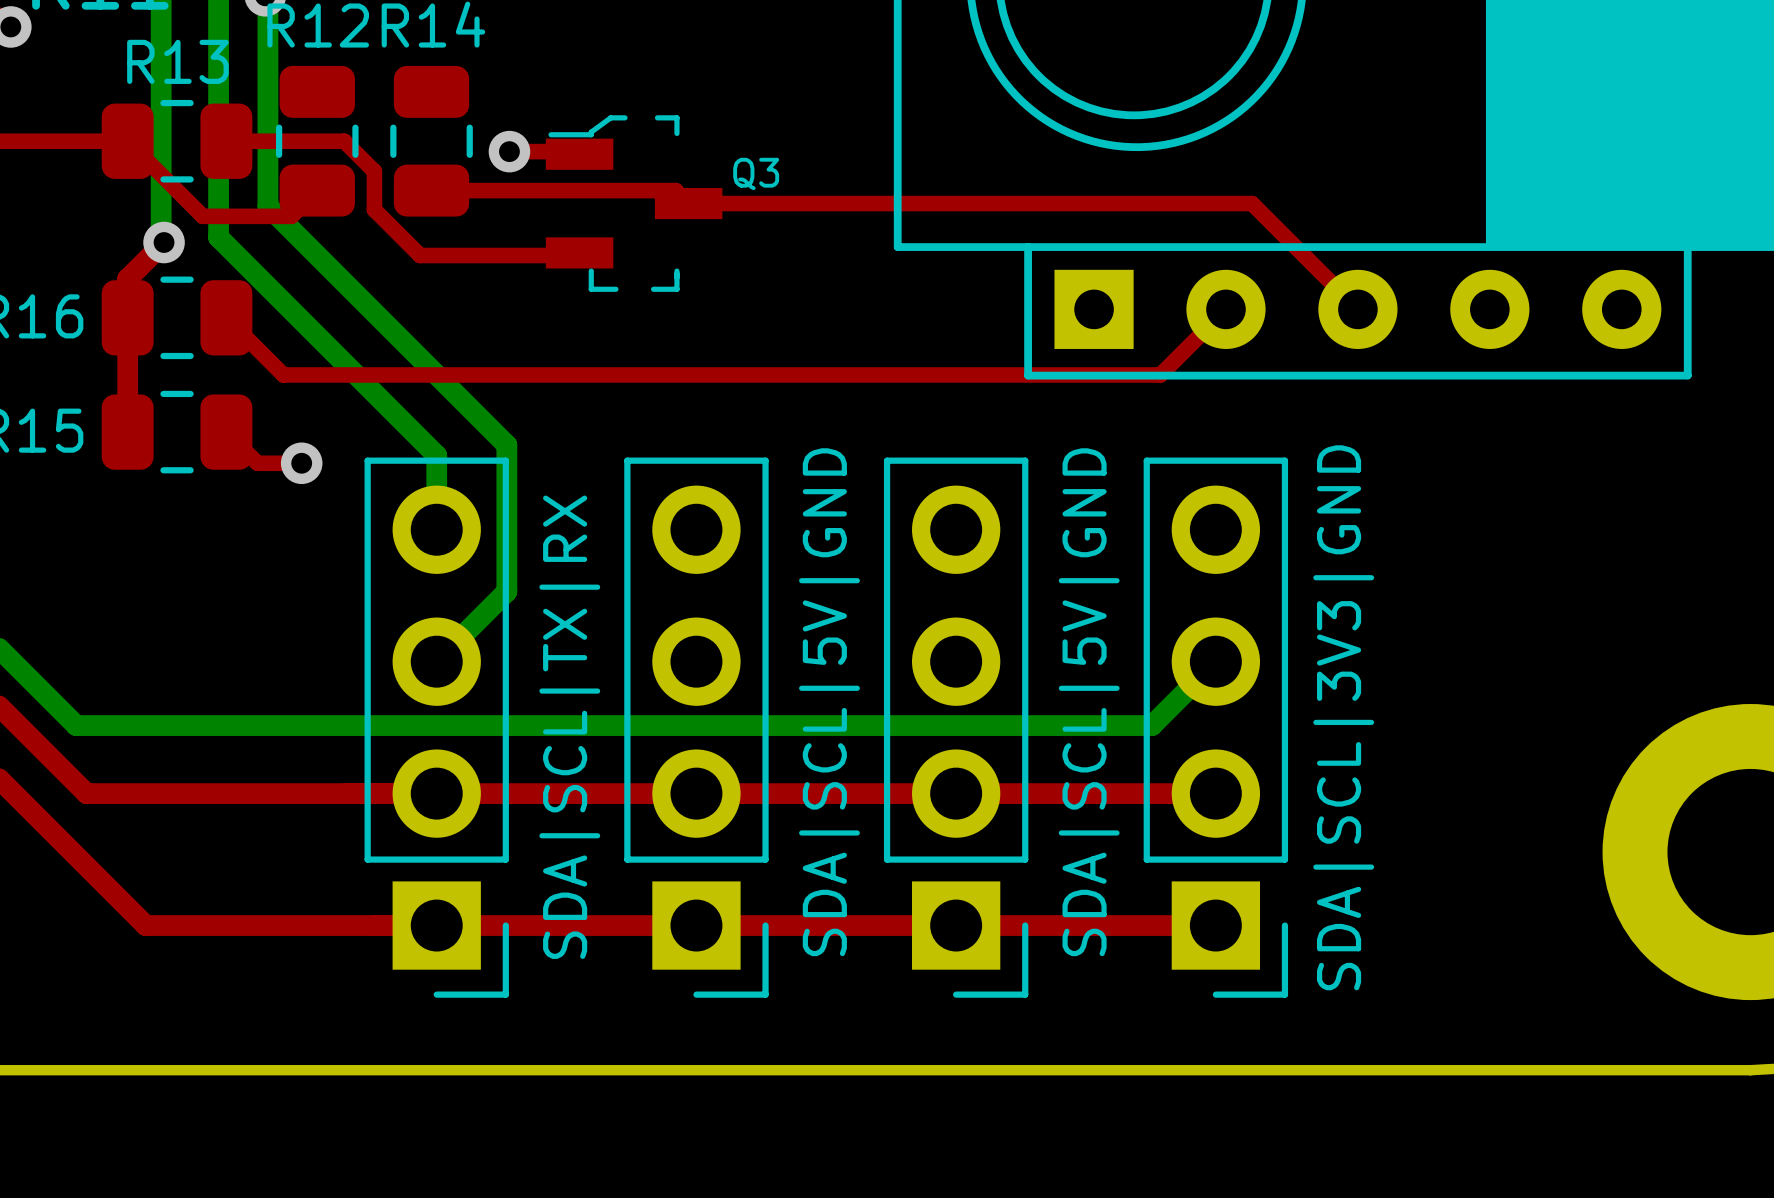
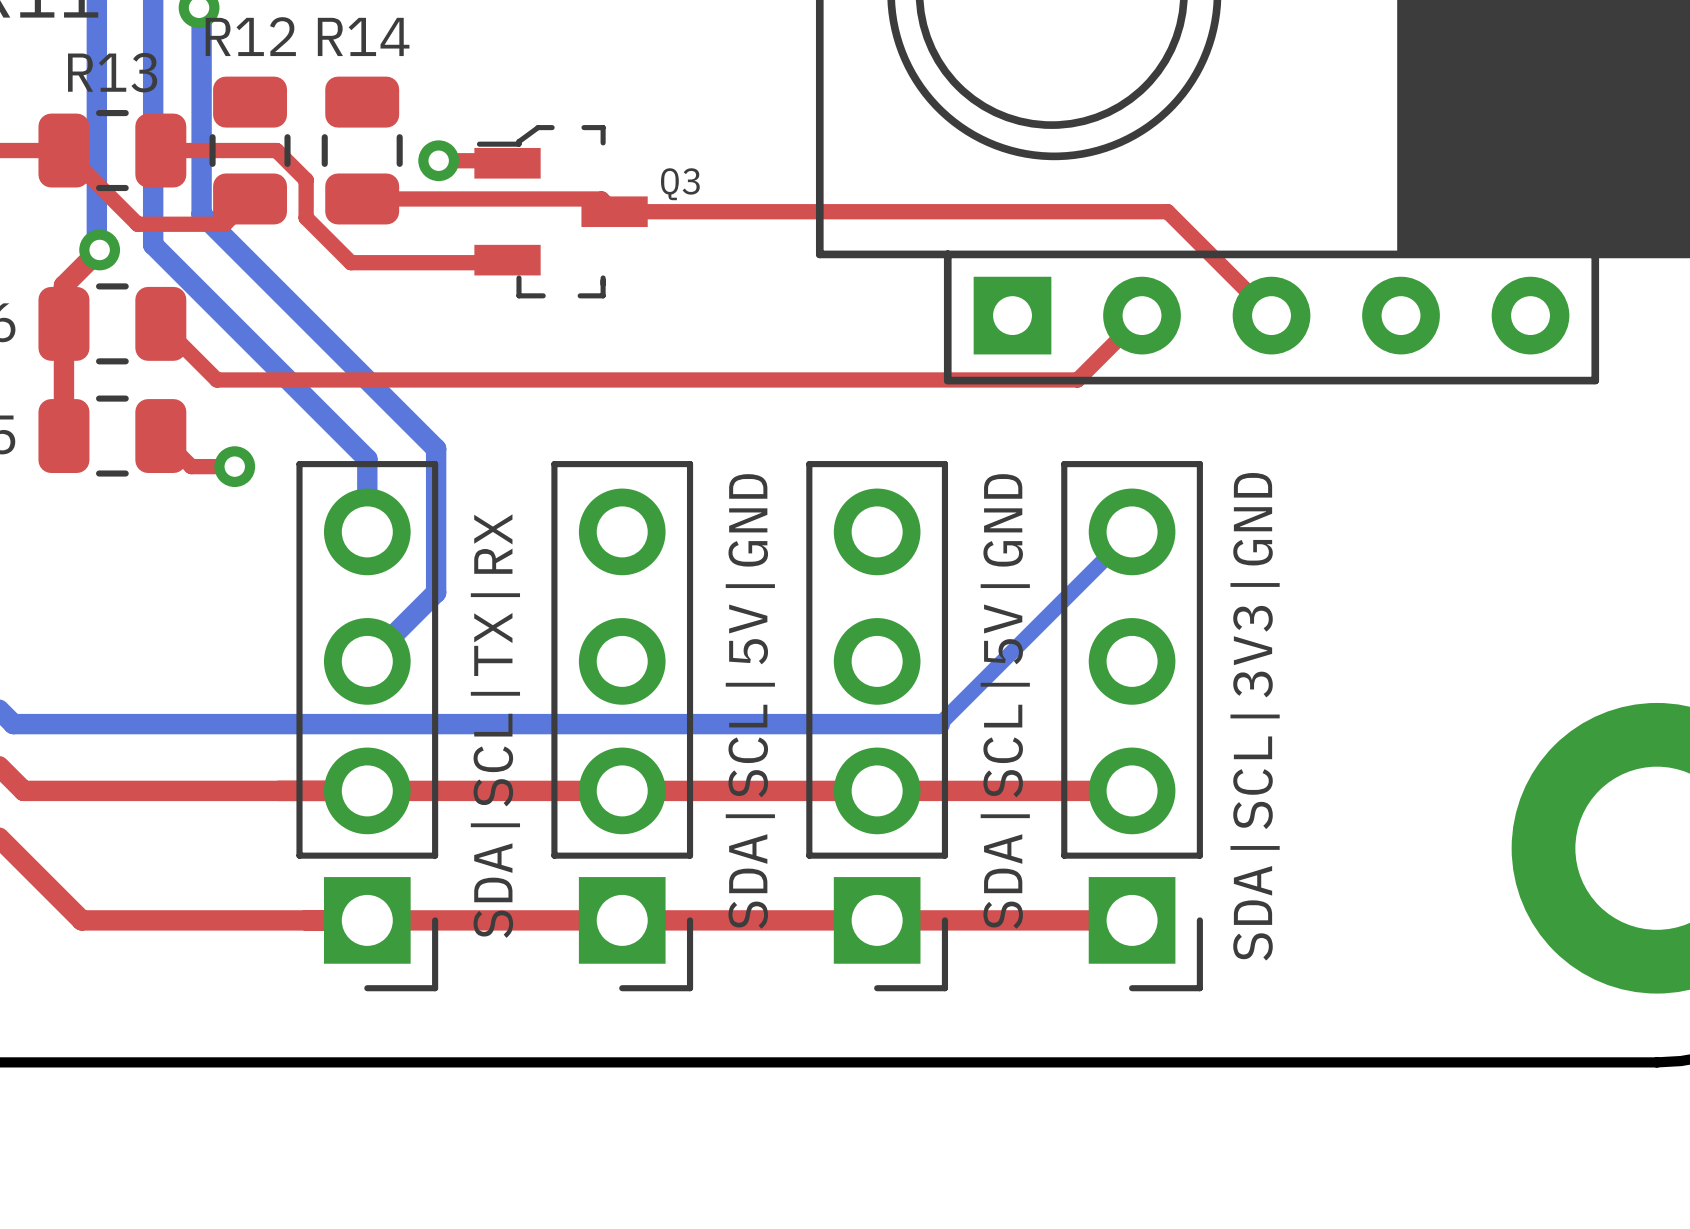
bottom track: (1215, 661) (1151, 725) (1020, 725) -> (1132, 531) (939, 724)

